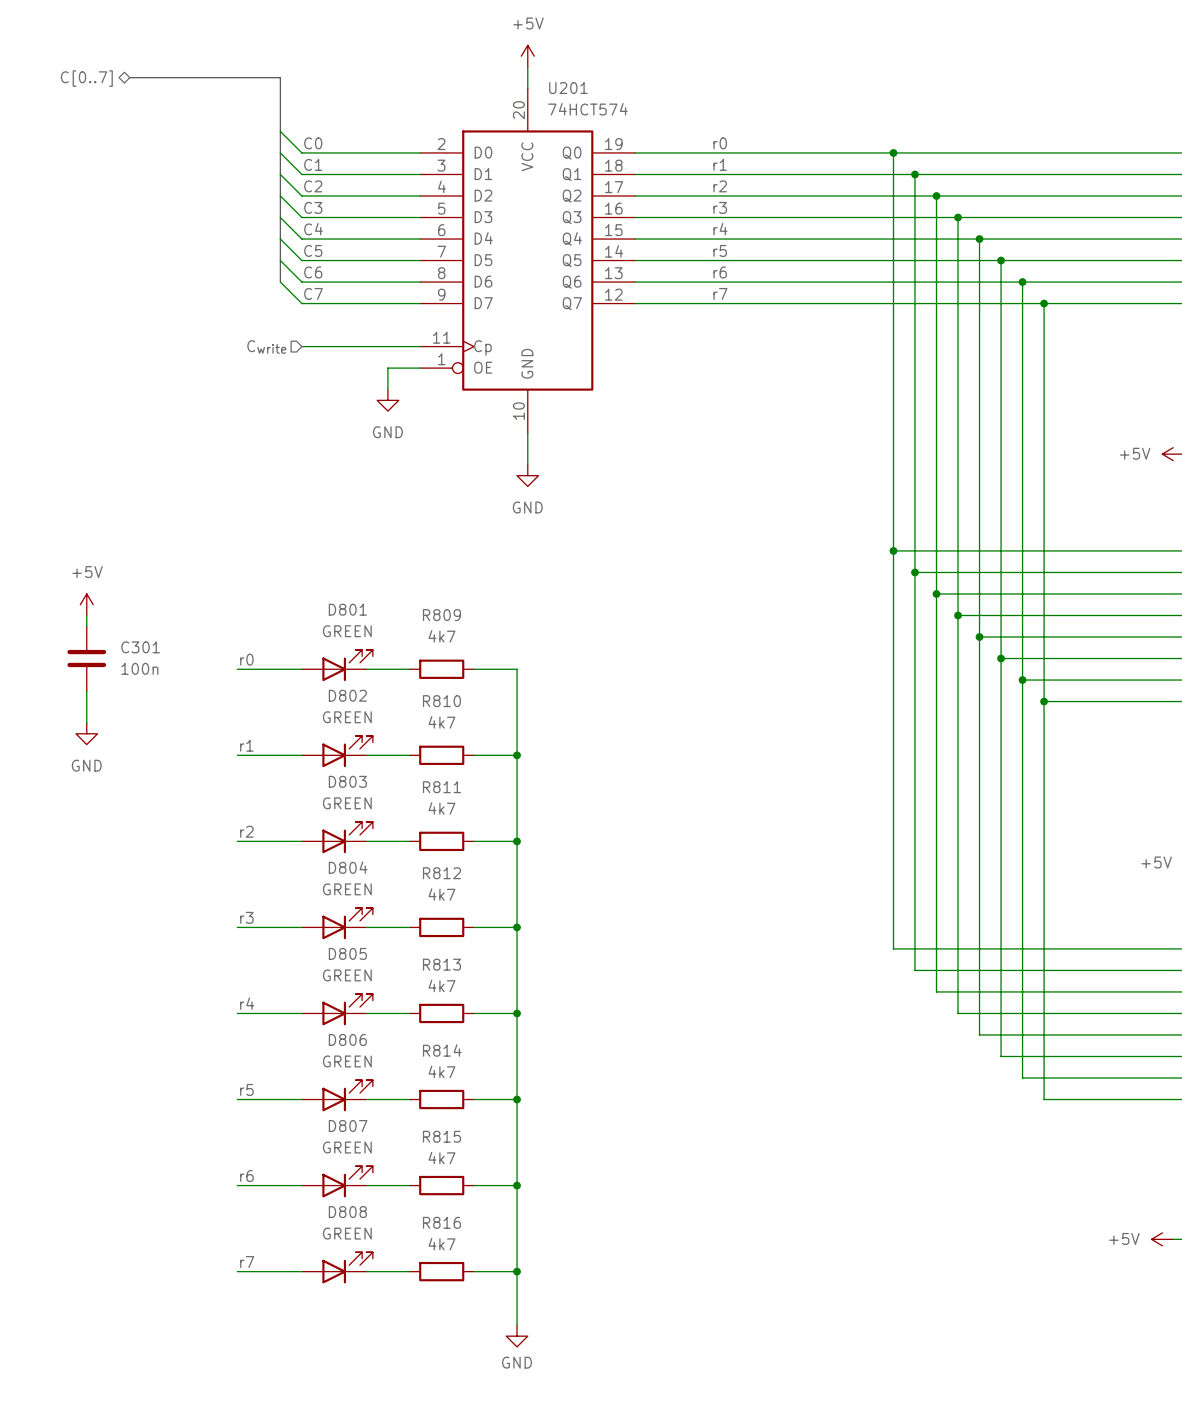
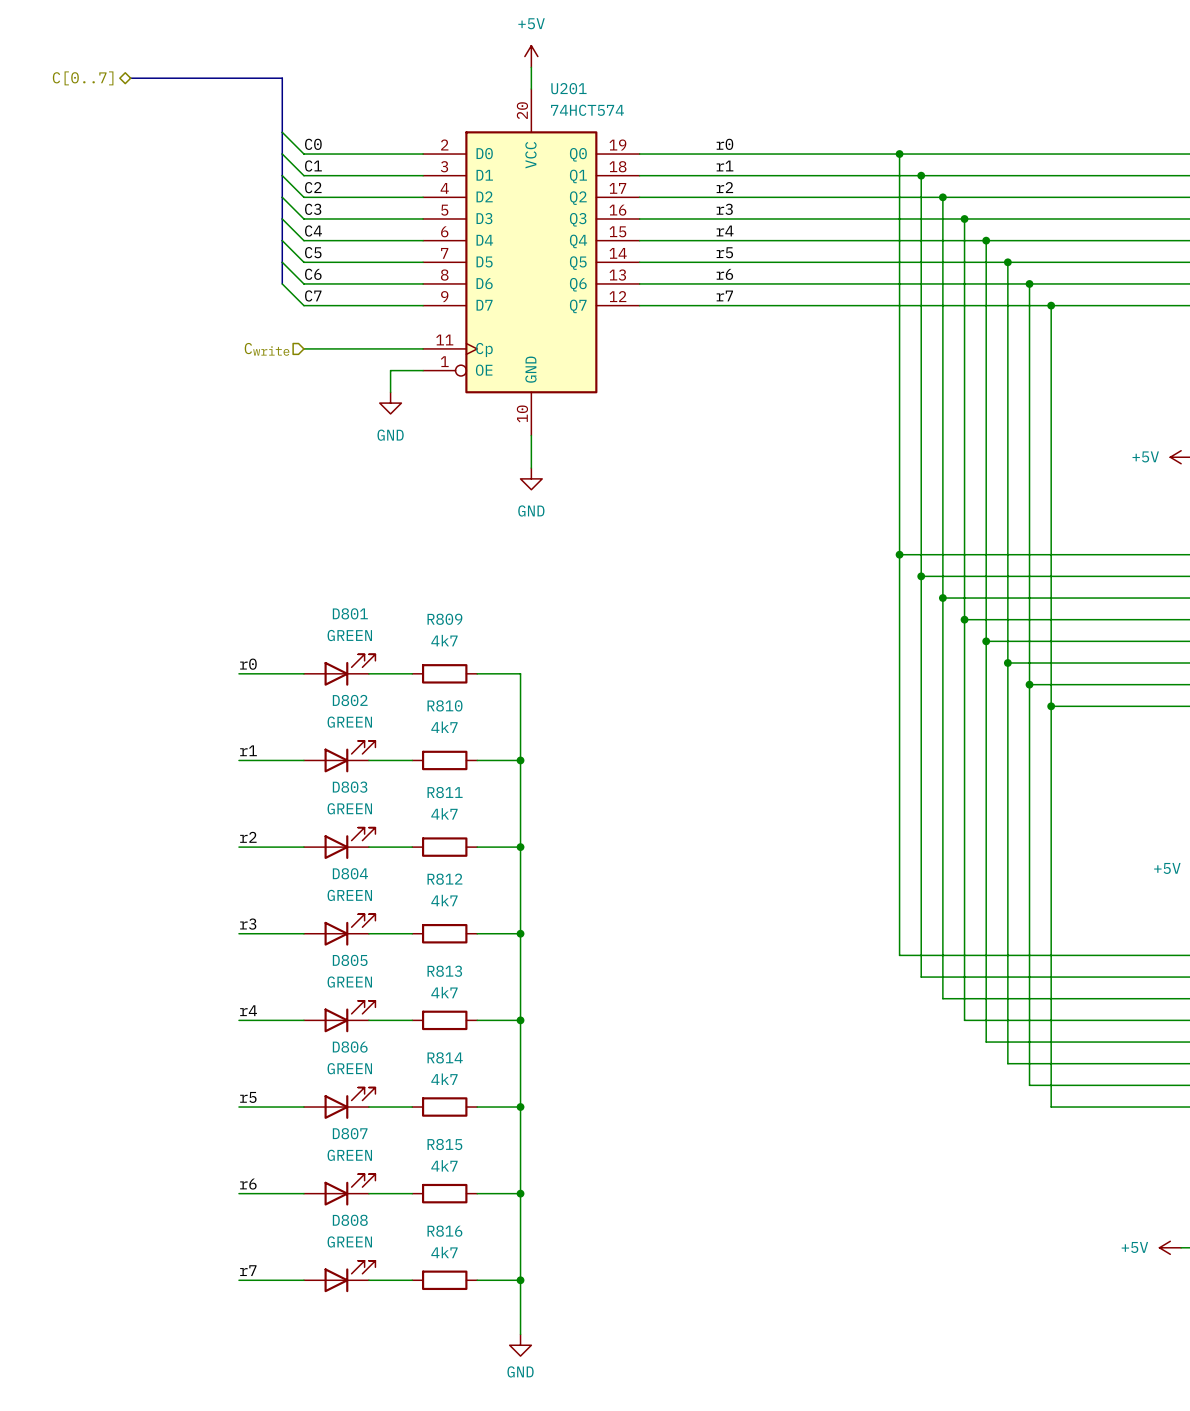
power symbol: +5V (86, 604) -> none
wire: (86, 615) (86, 626) -> none
C301: 100n (86, 658) -> none
wire: (86, 690) (86, 723) -> none
power symbol: GND (86, 733) -> none

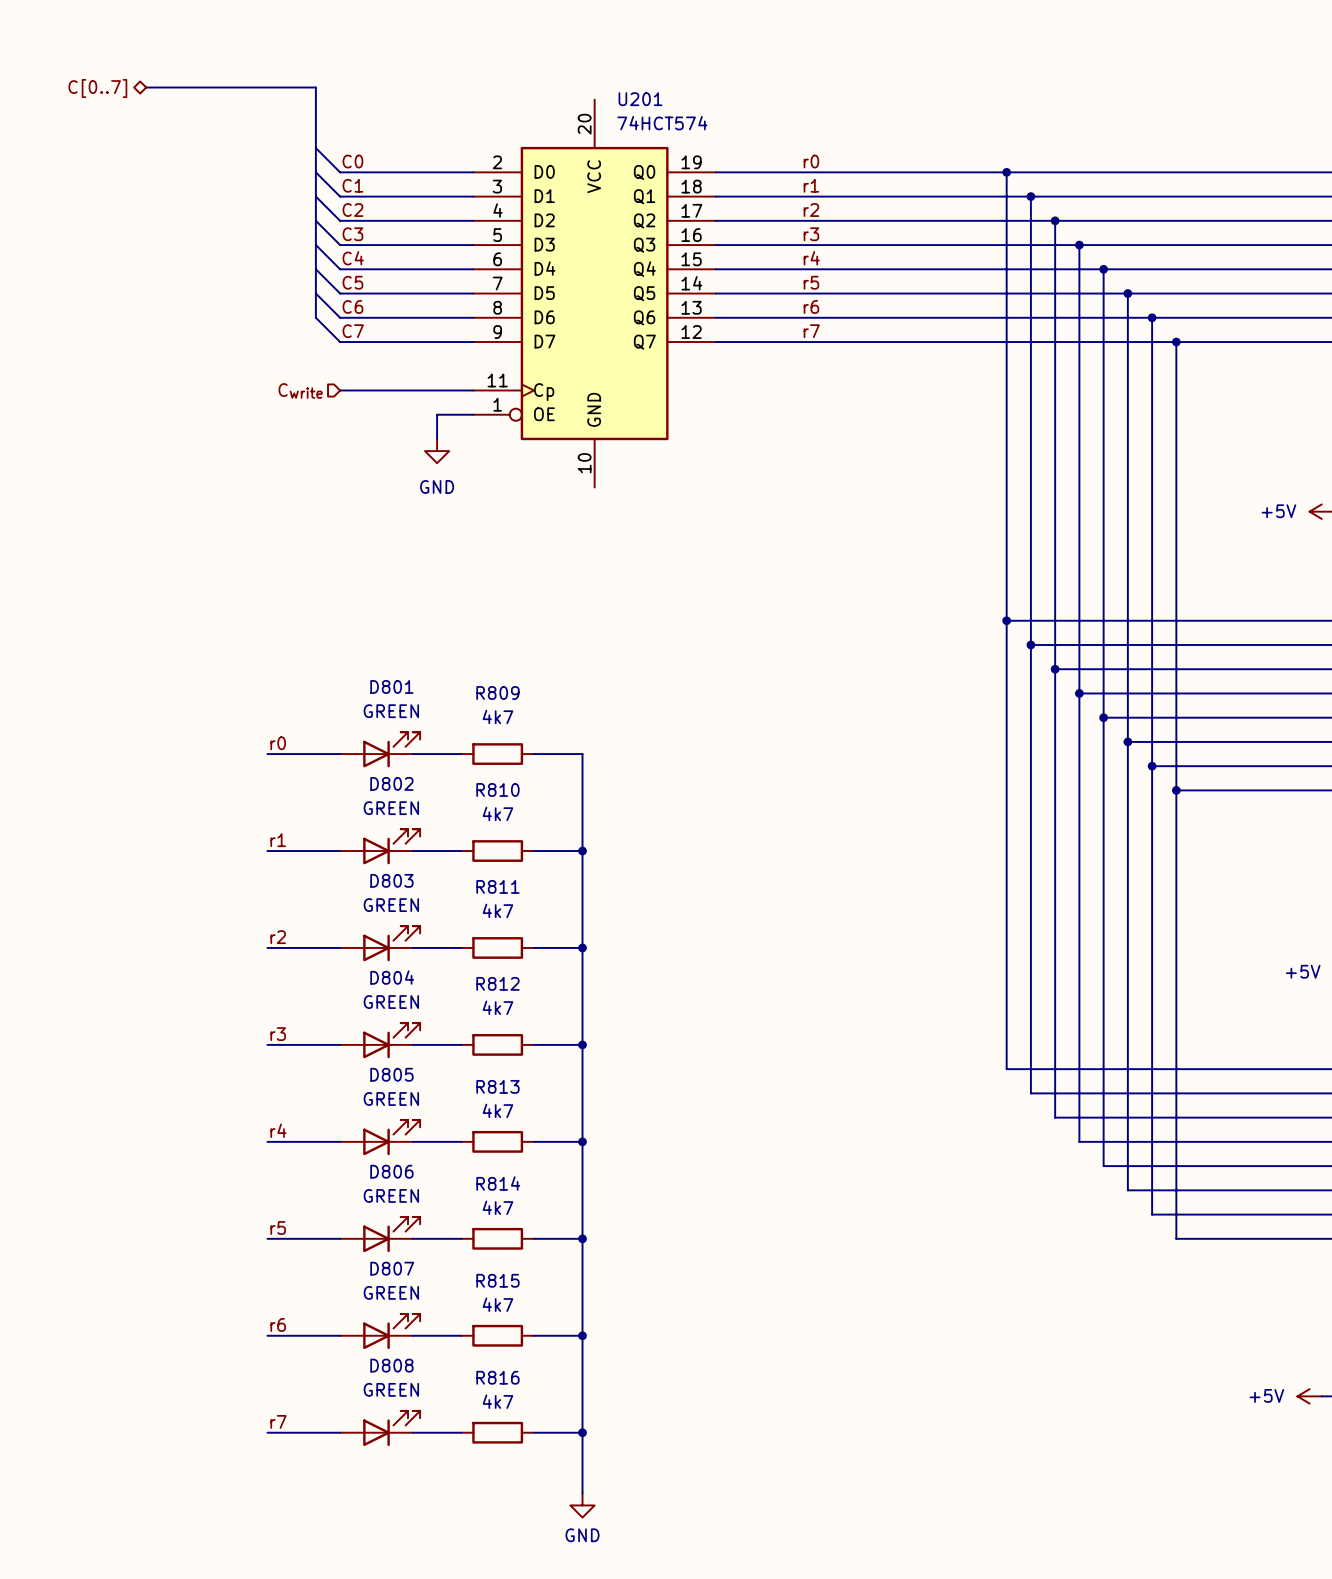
power symbol: +5V (531, 56) -> none
wire: (531, 67) (531, 89) -> none
wire: (531, 435) (531, 468) -> none
power symbol: GND (531, 478) -> none

